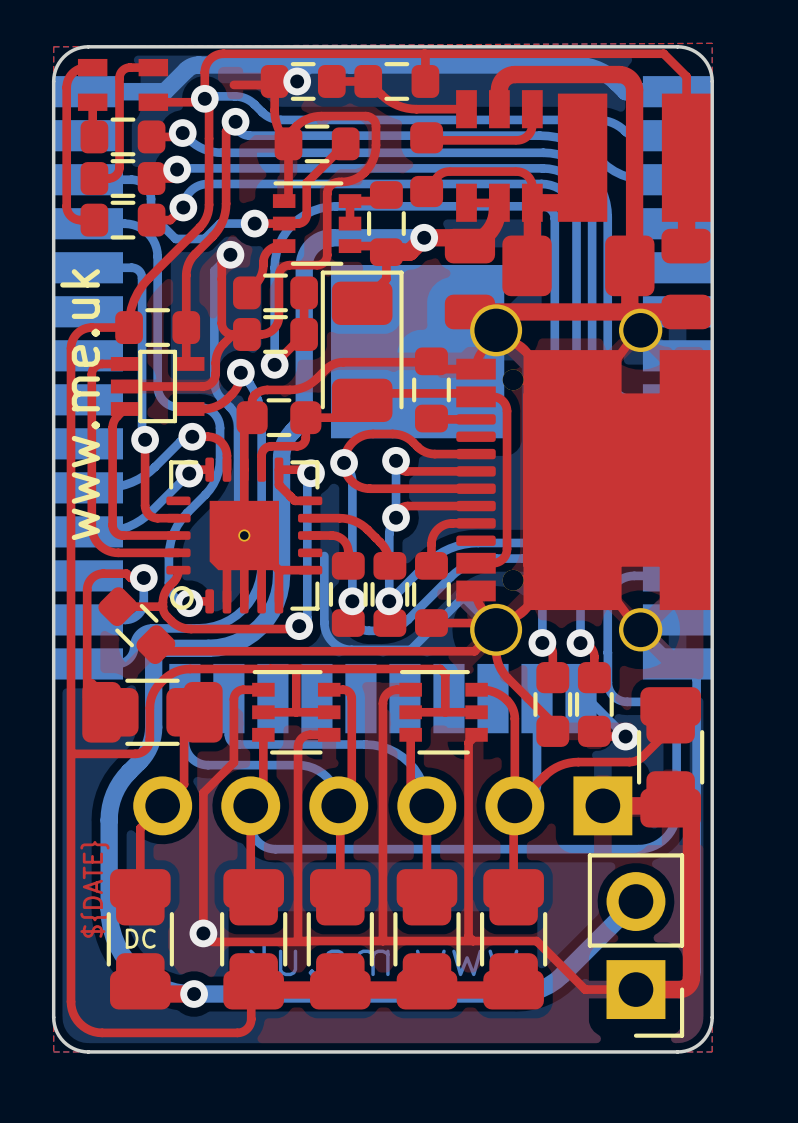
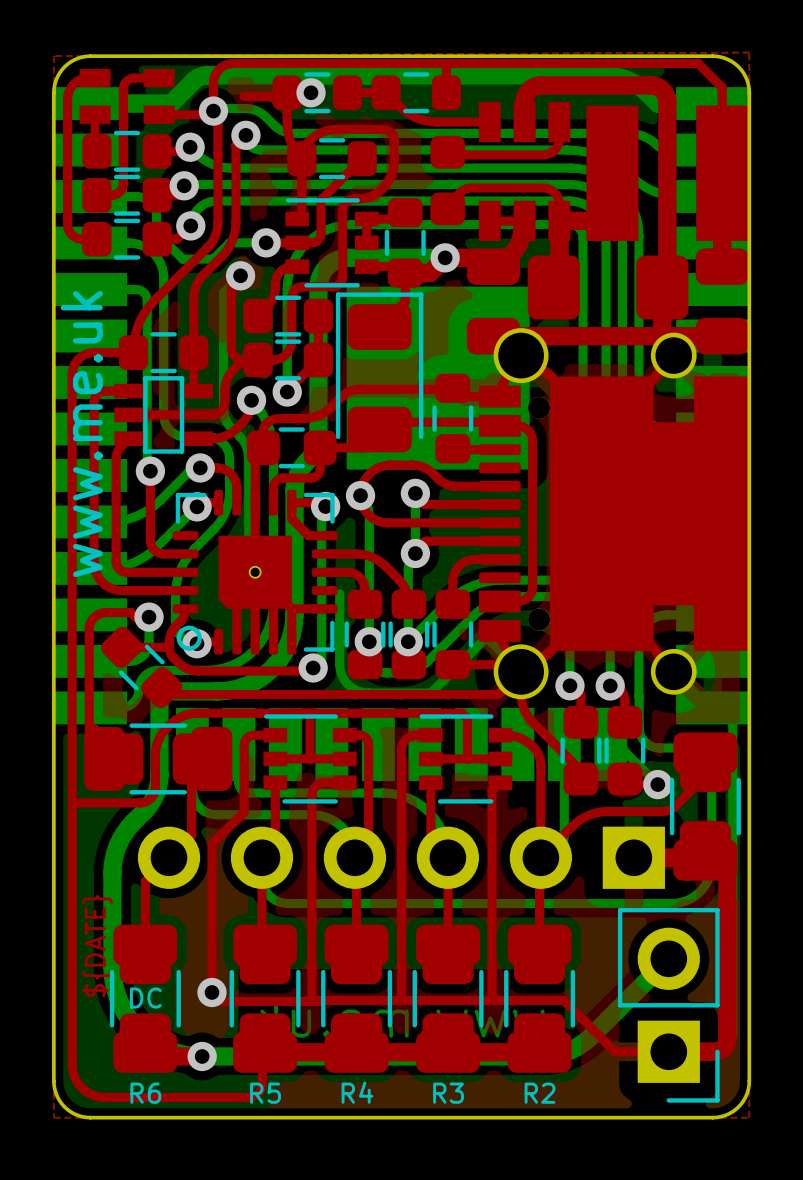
R6 name: none -> R6 (145, 1093)
R5 name: none -> R5 (265, 1093)
R4 name: none -> R4 (357, 1092)
R3 name: none -> R3 (448, 1093)
R2 name: none -> R2 (540, 1093)

